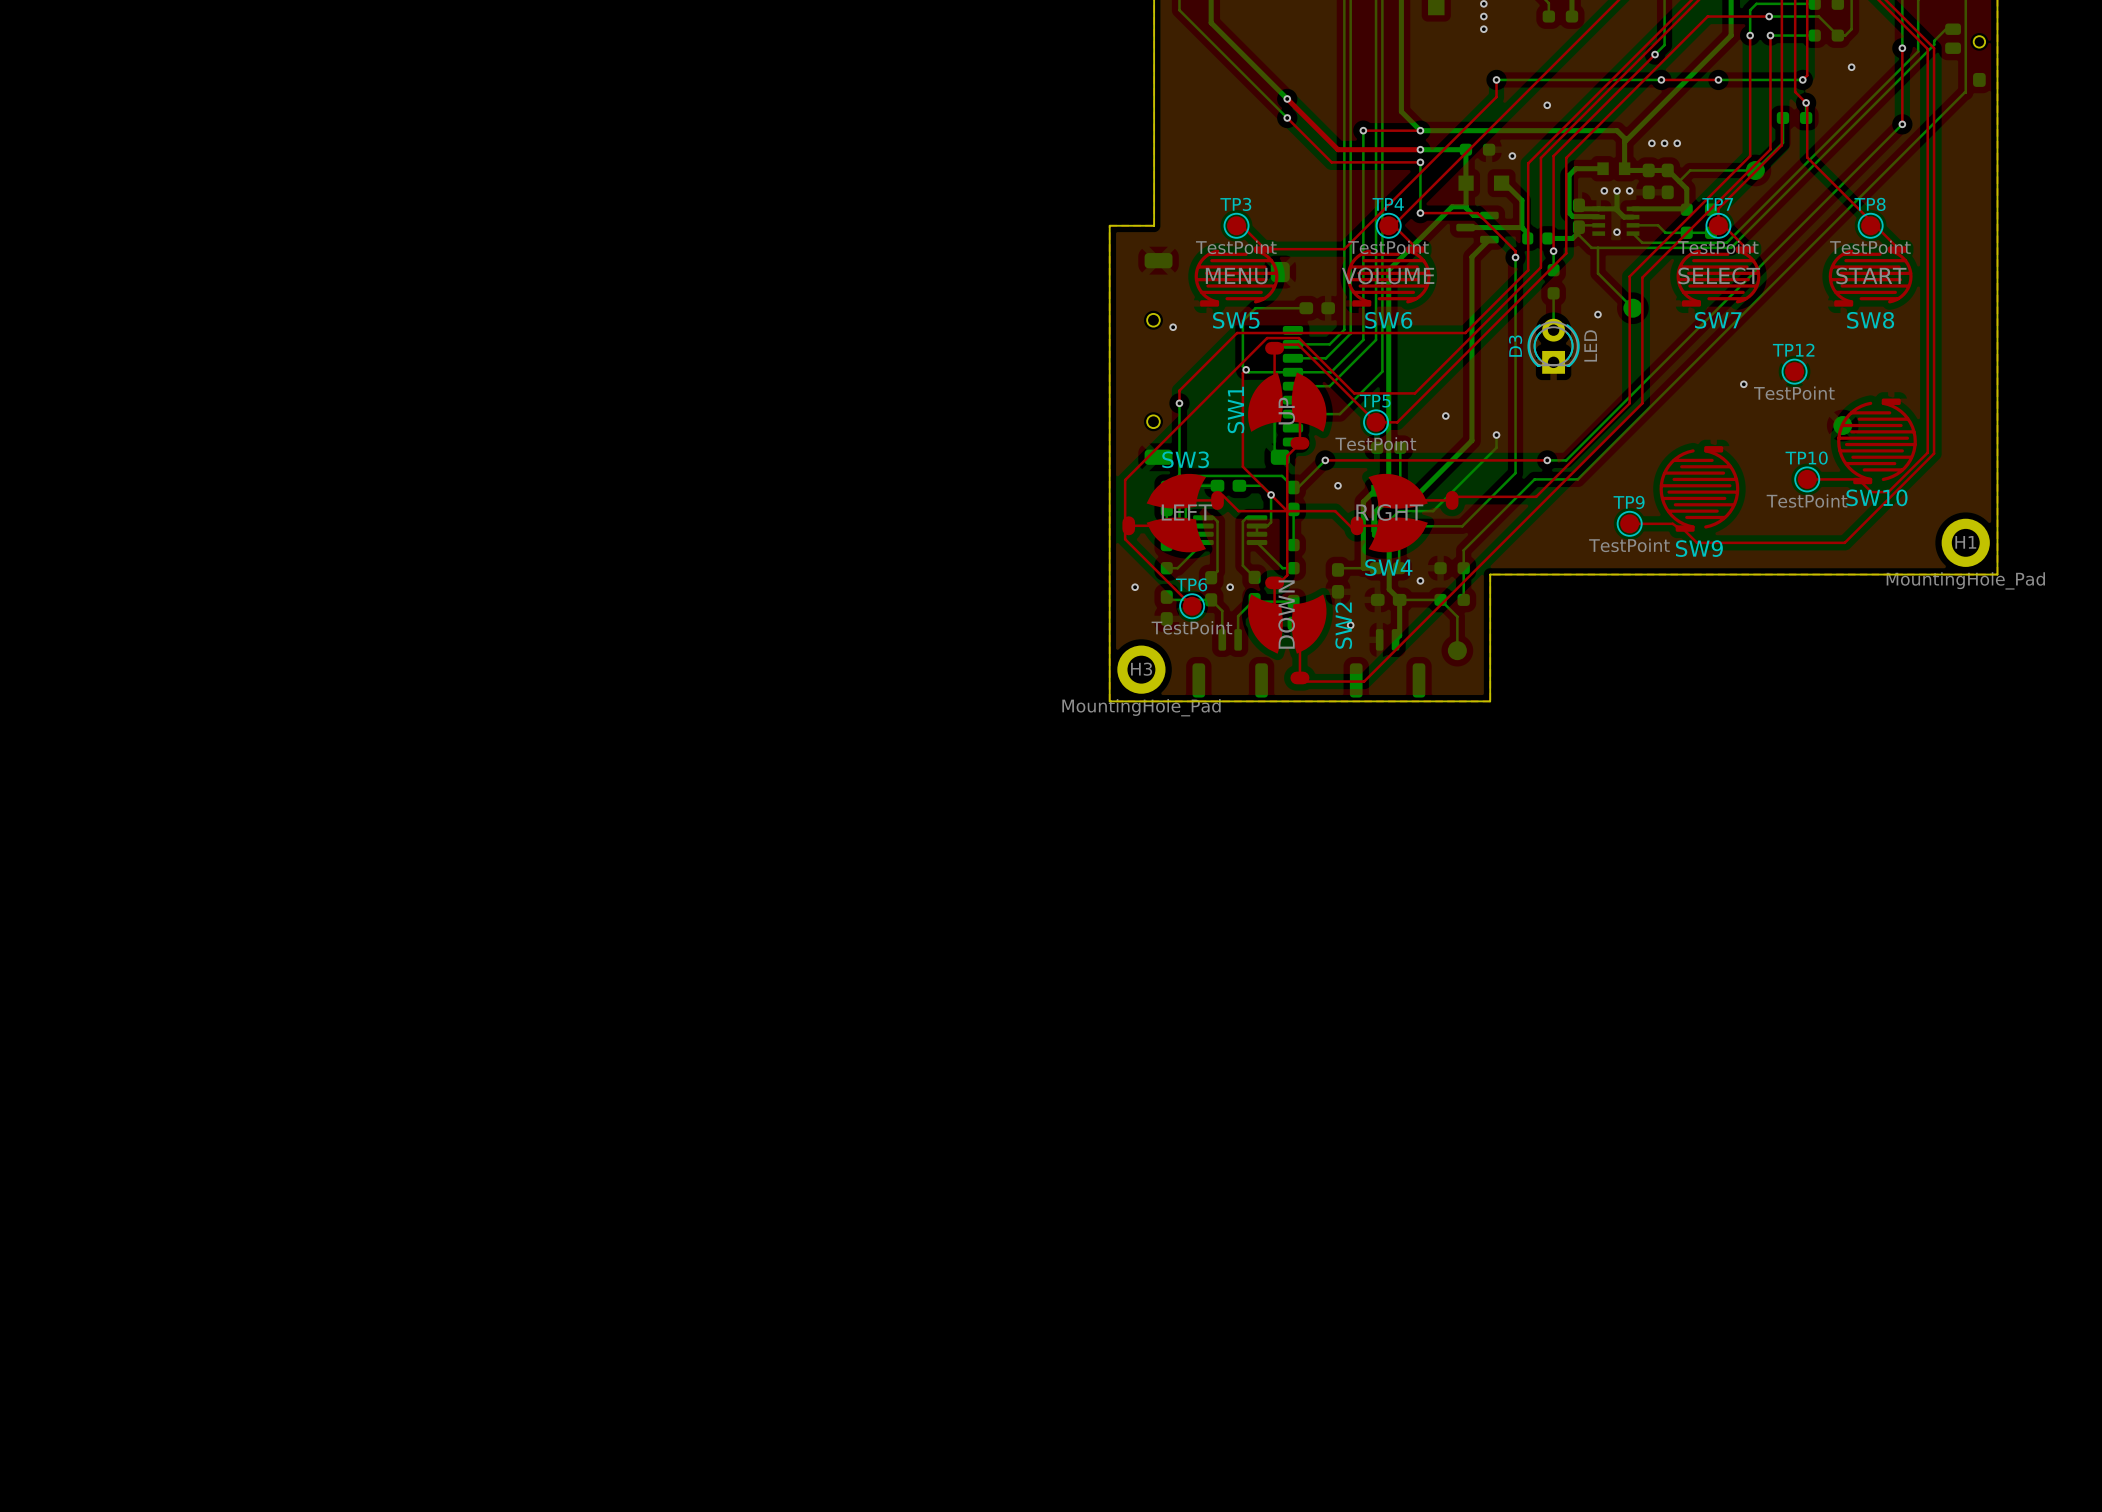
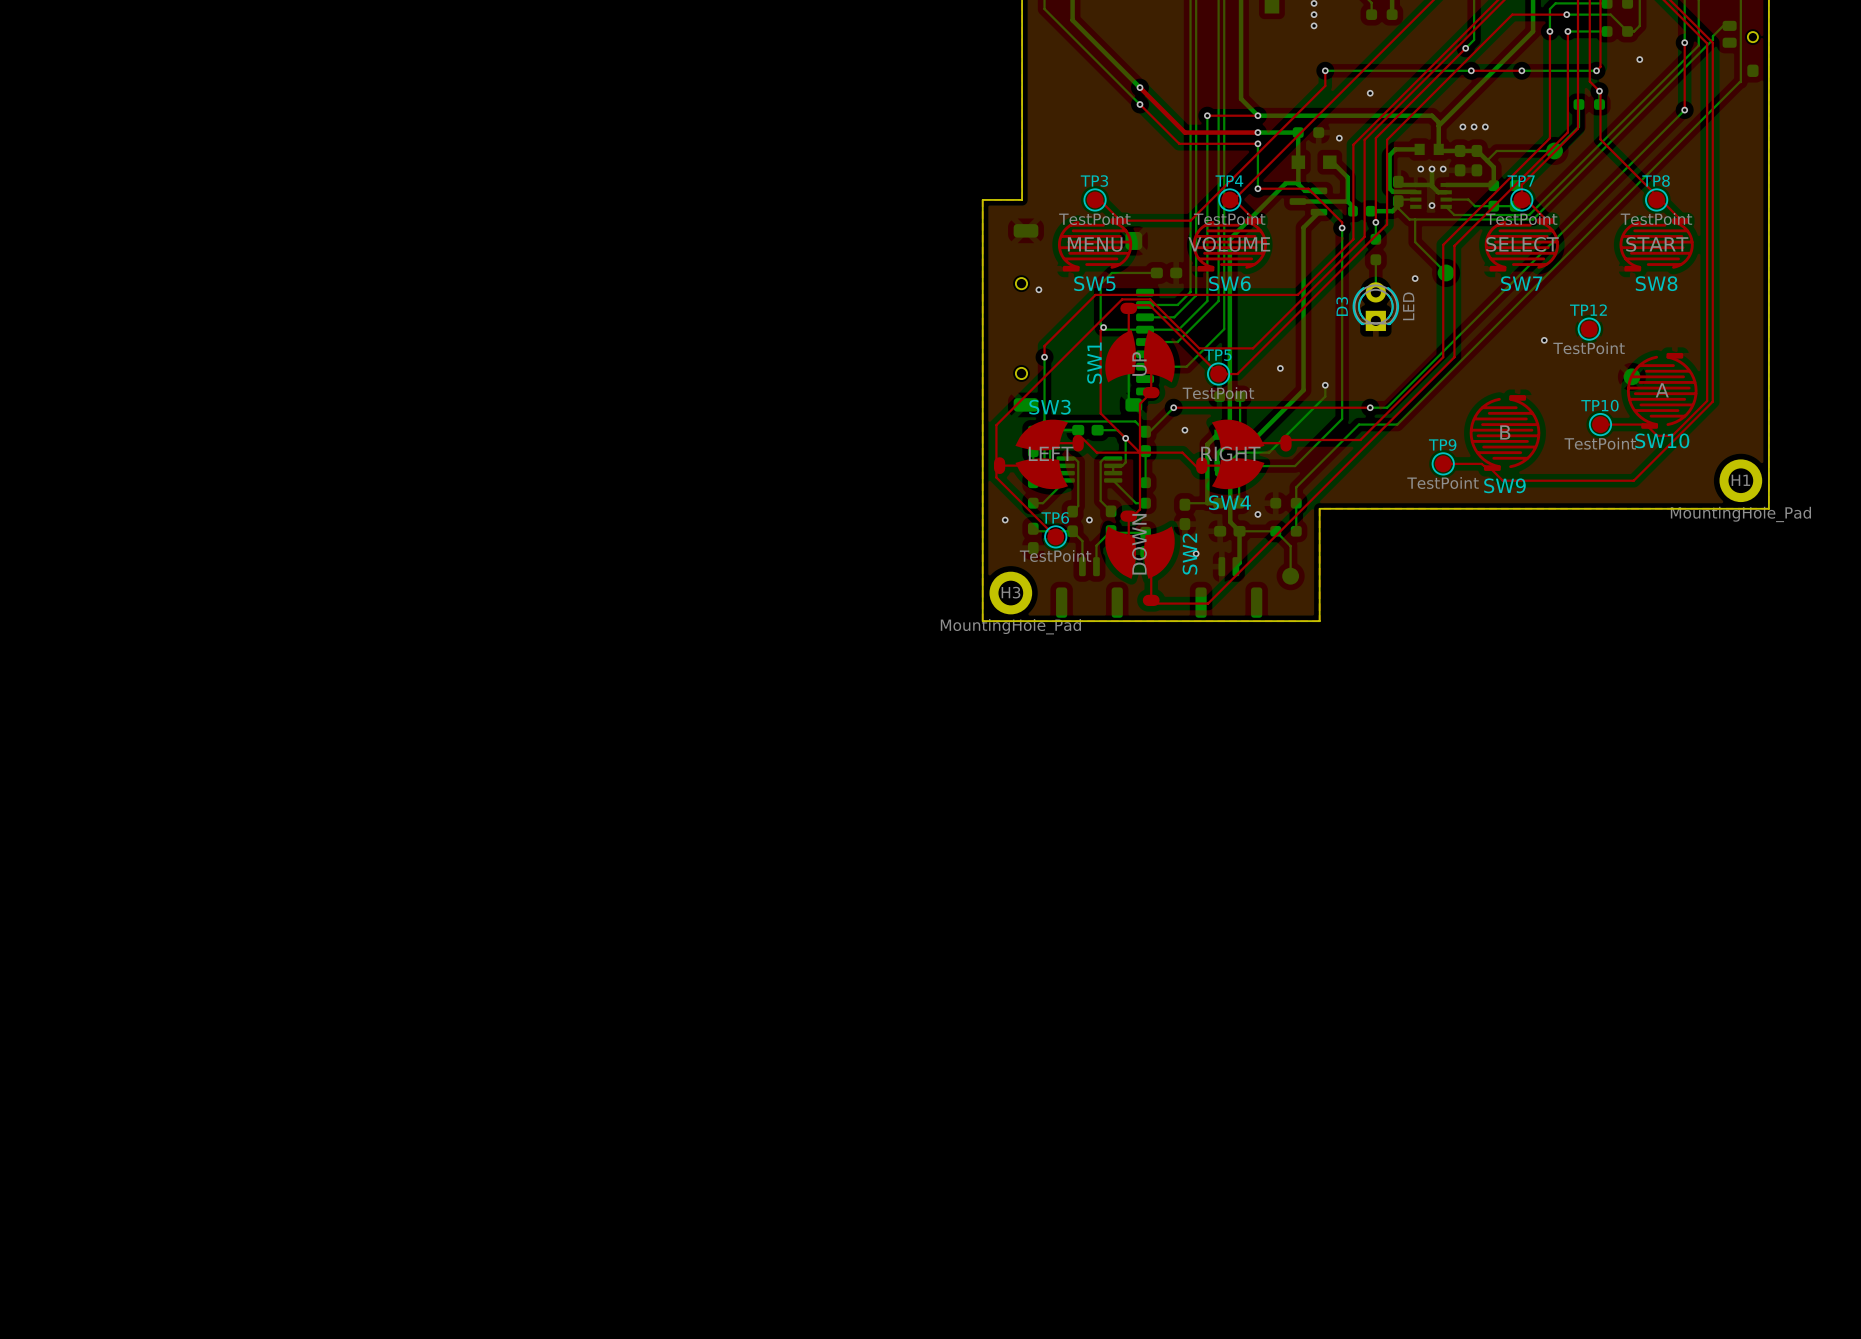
SW10 value: none -> A (1662, 390)
SW9 value: none -> B (1505, 432)

